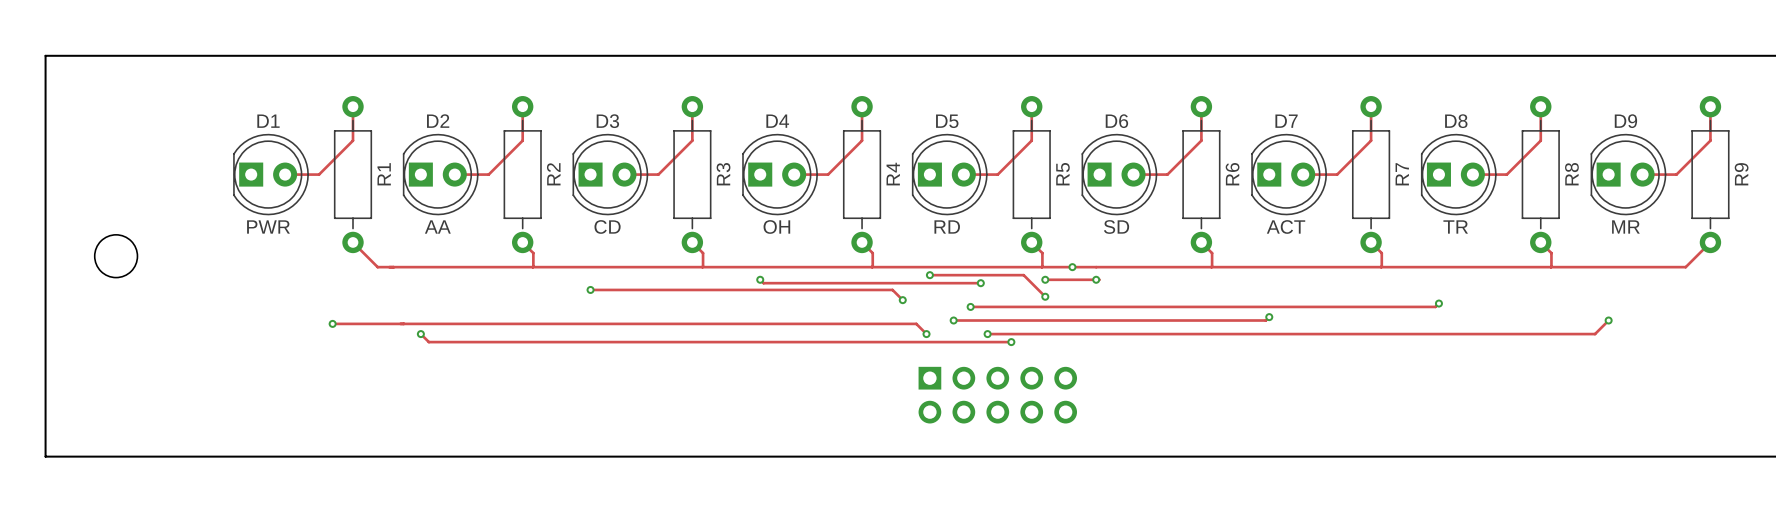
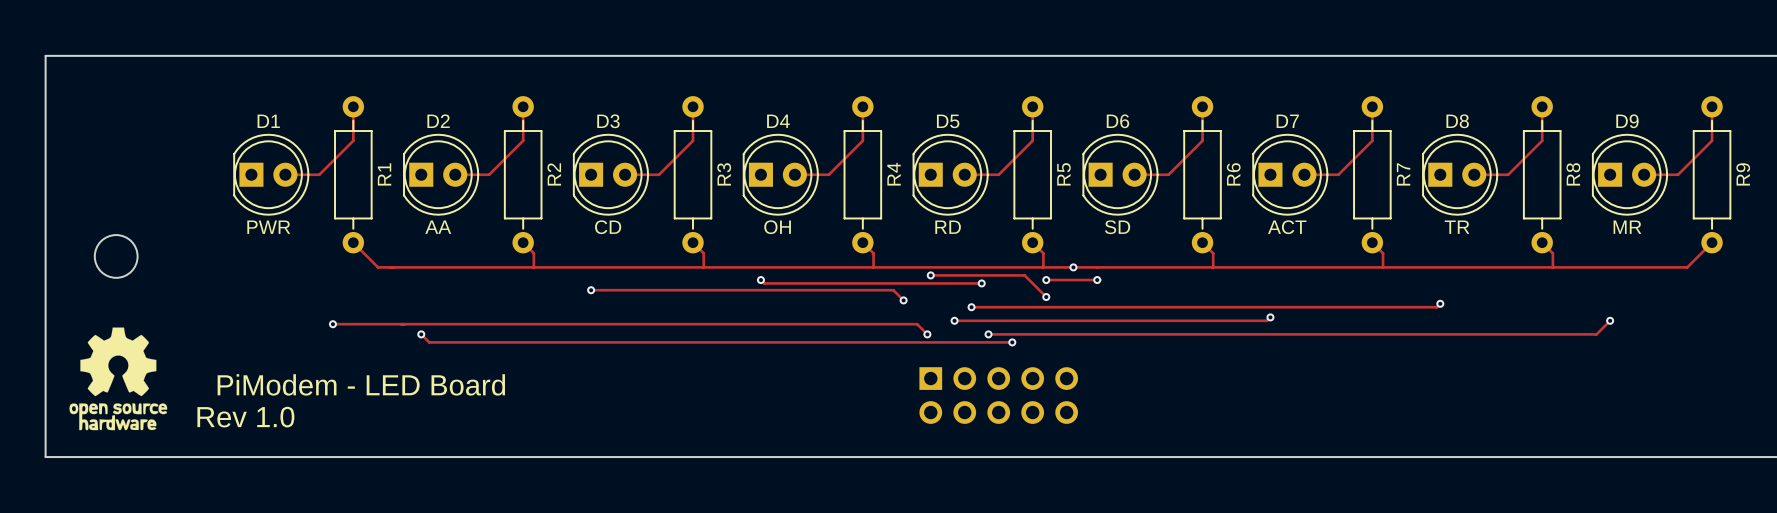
drawing: none -> [69, 327, 168, 431]
text: none -> PiModem - LED Board (361, 384)
text: none -> Rev 1.0 (245, 417)

